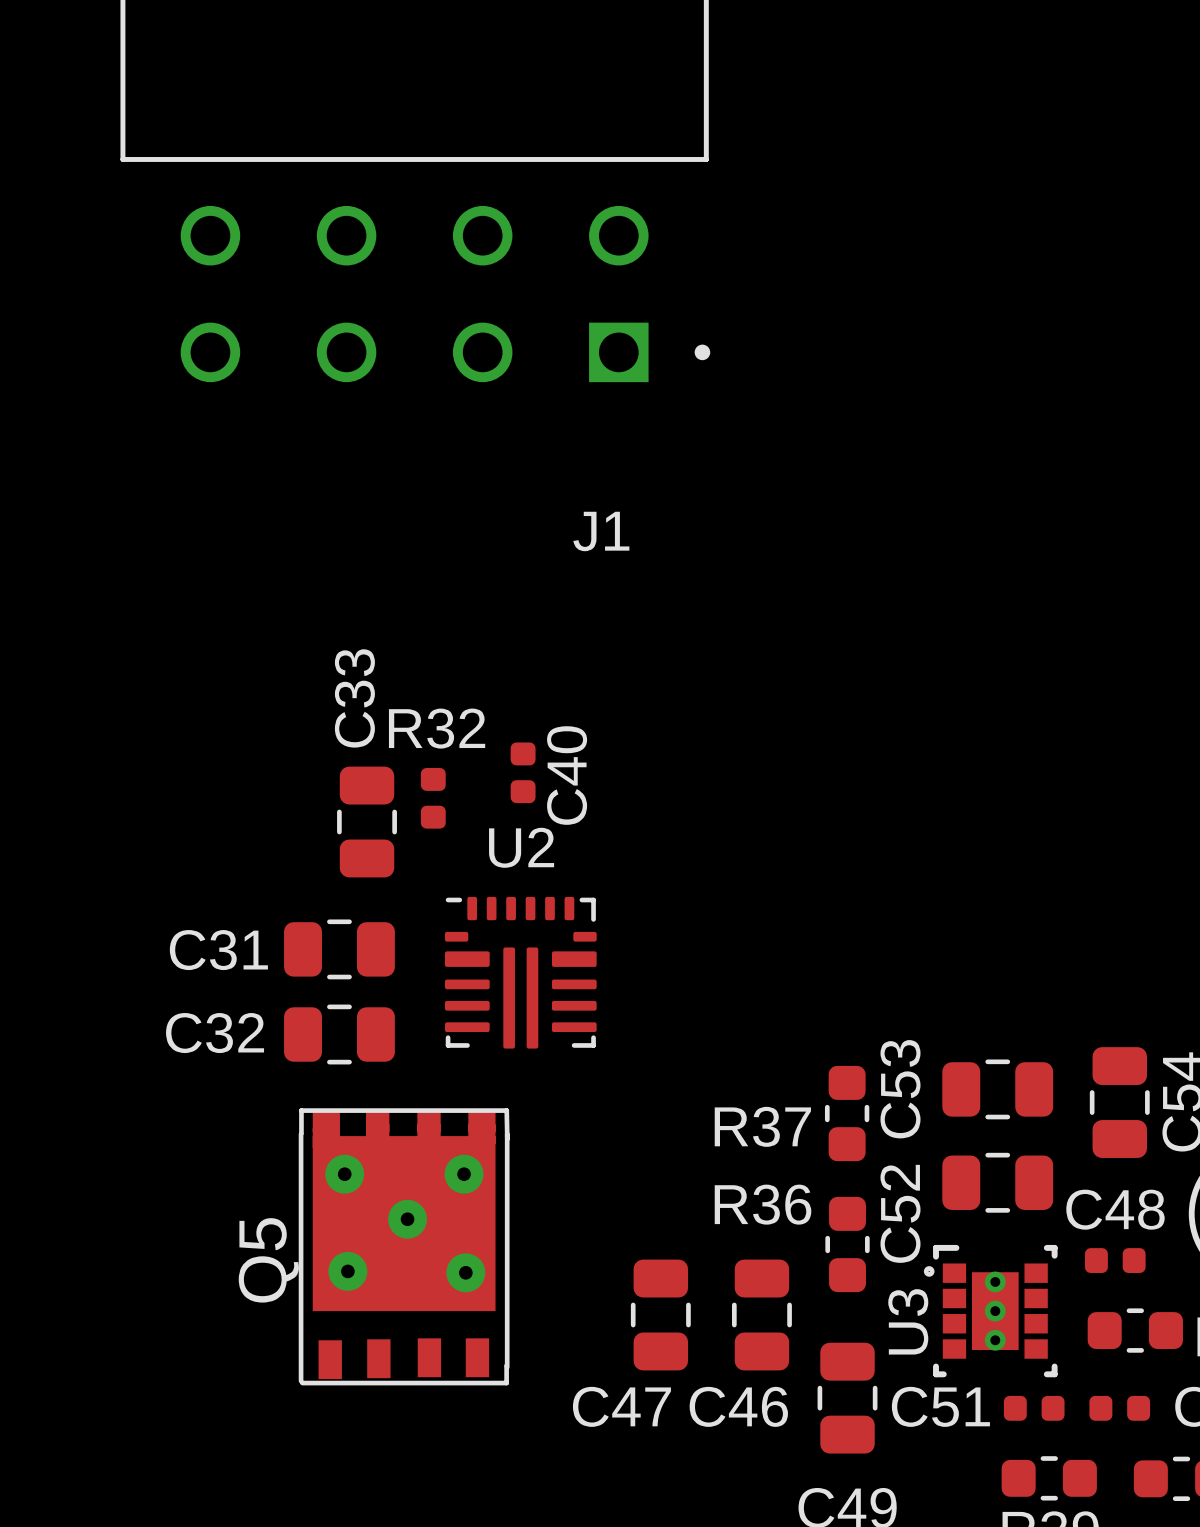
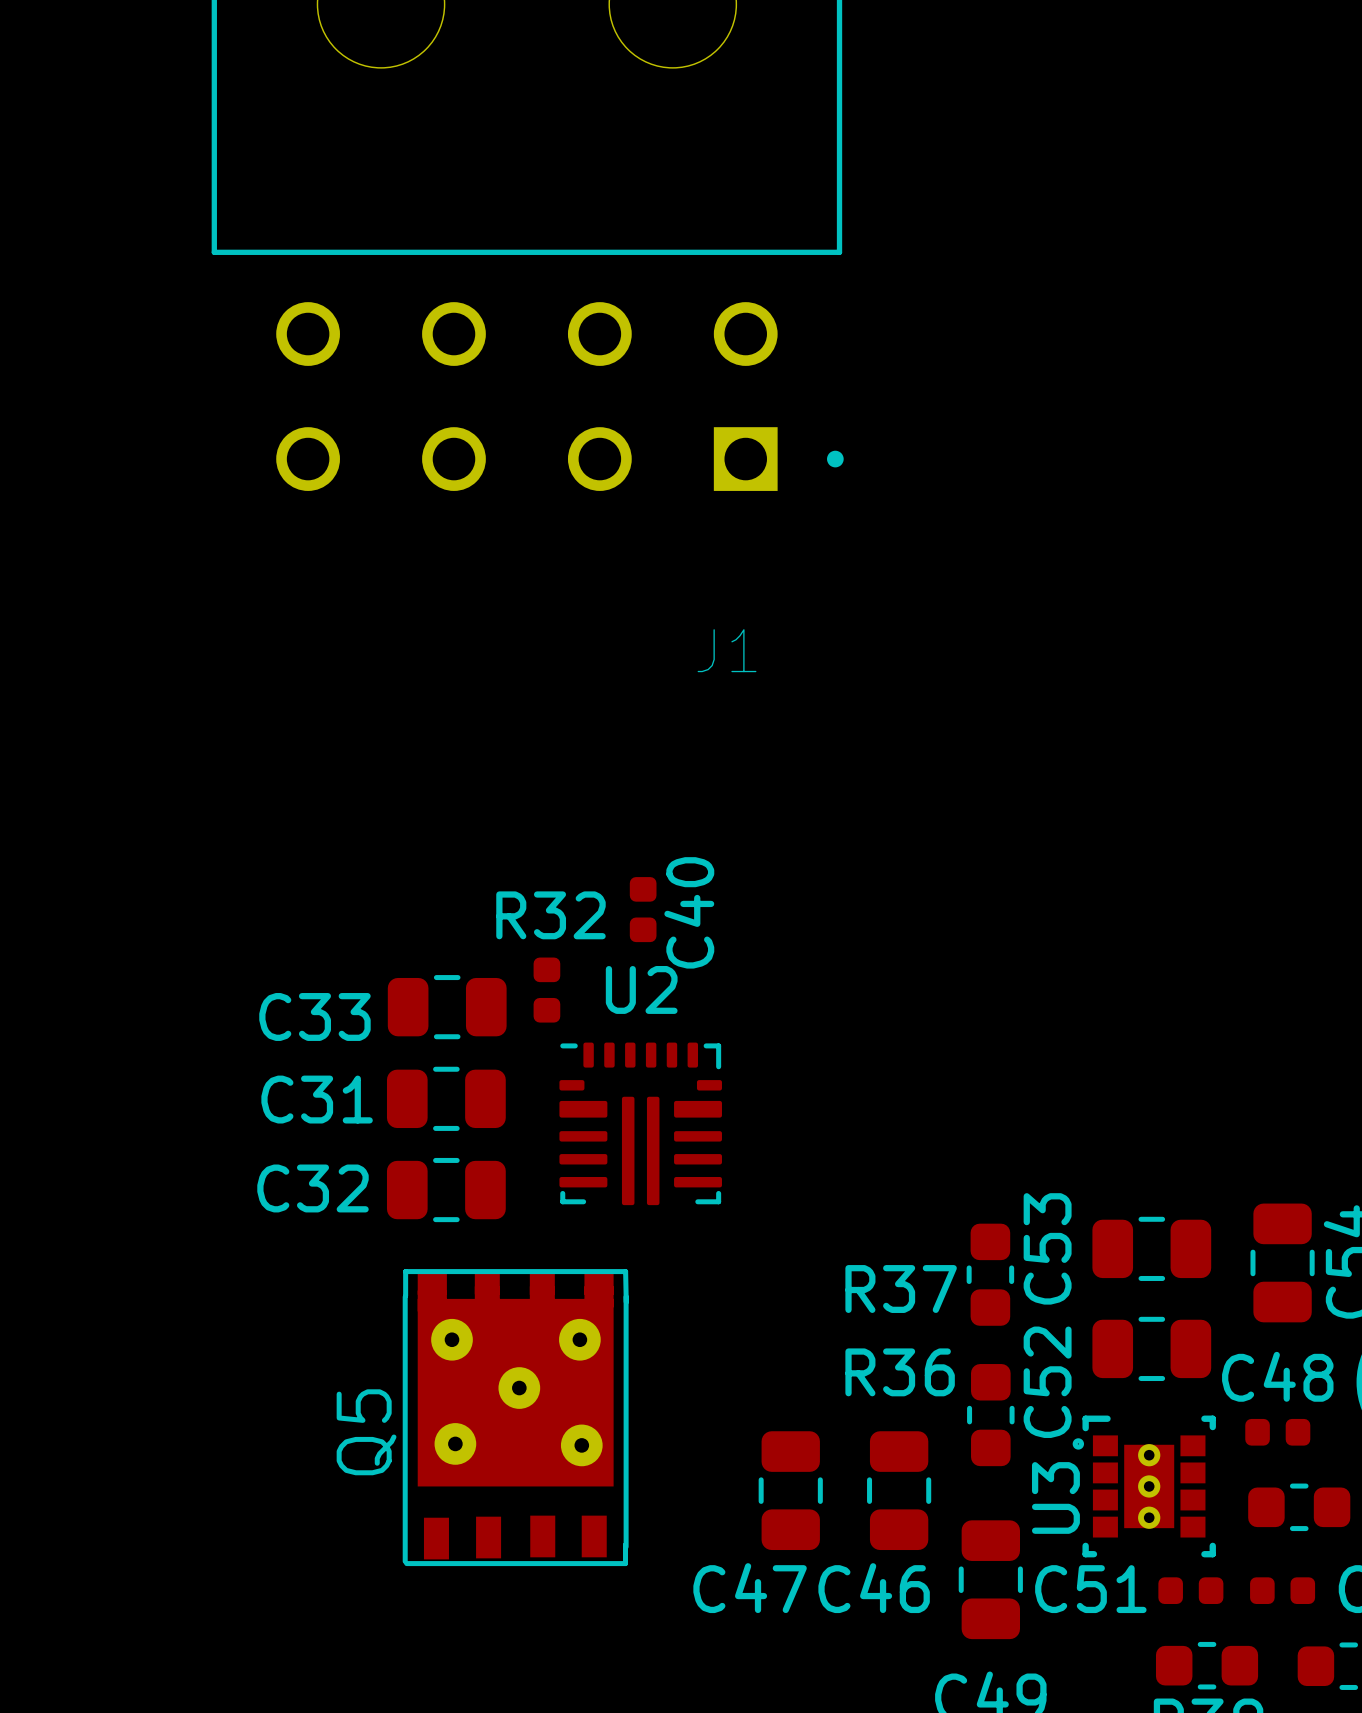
C33 name position: C33 (354, 698) -> C33 (314, 1016)
R32 position: (433, 798) -> (546, 990)
C33 rotation: 0° (367, 822) -> 90° clockwise (447, 1007)

